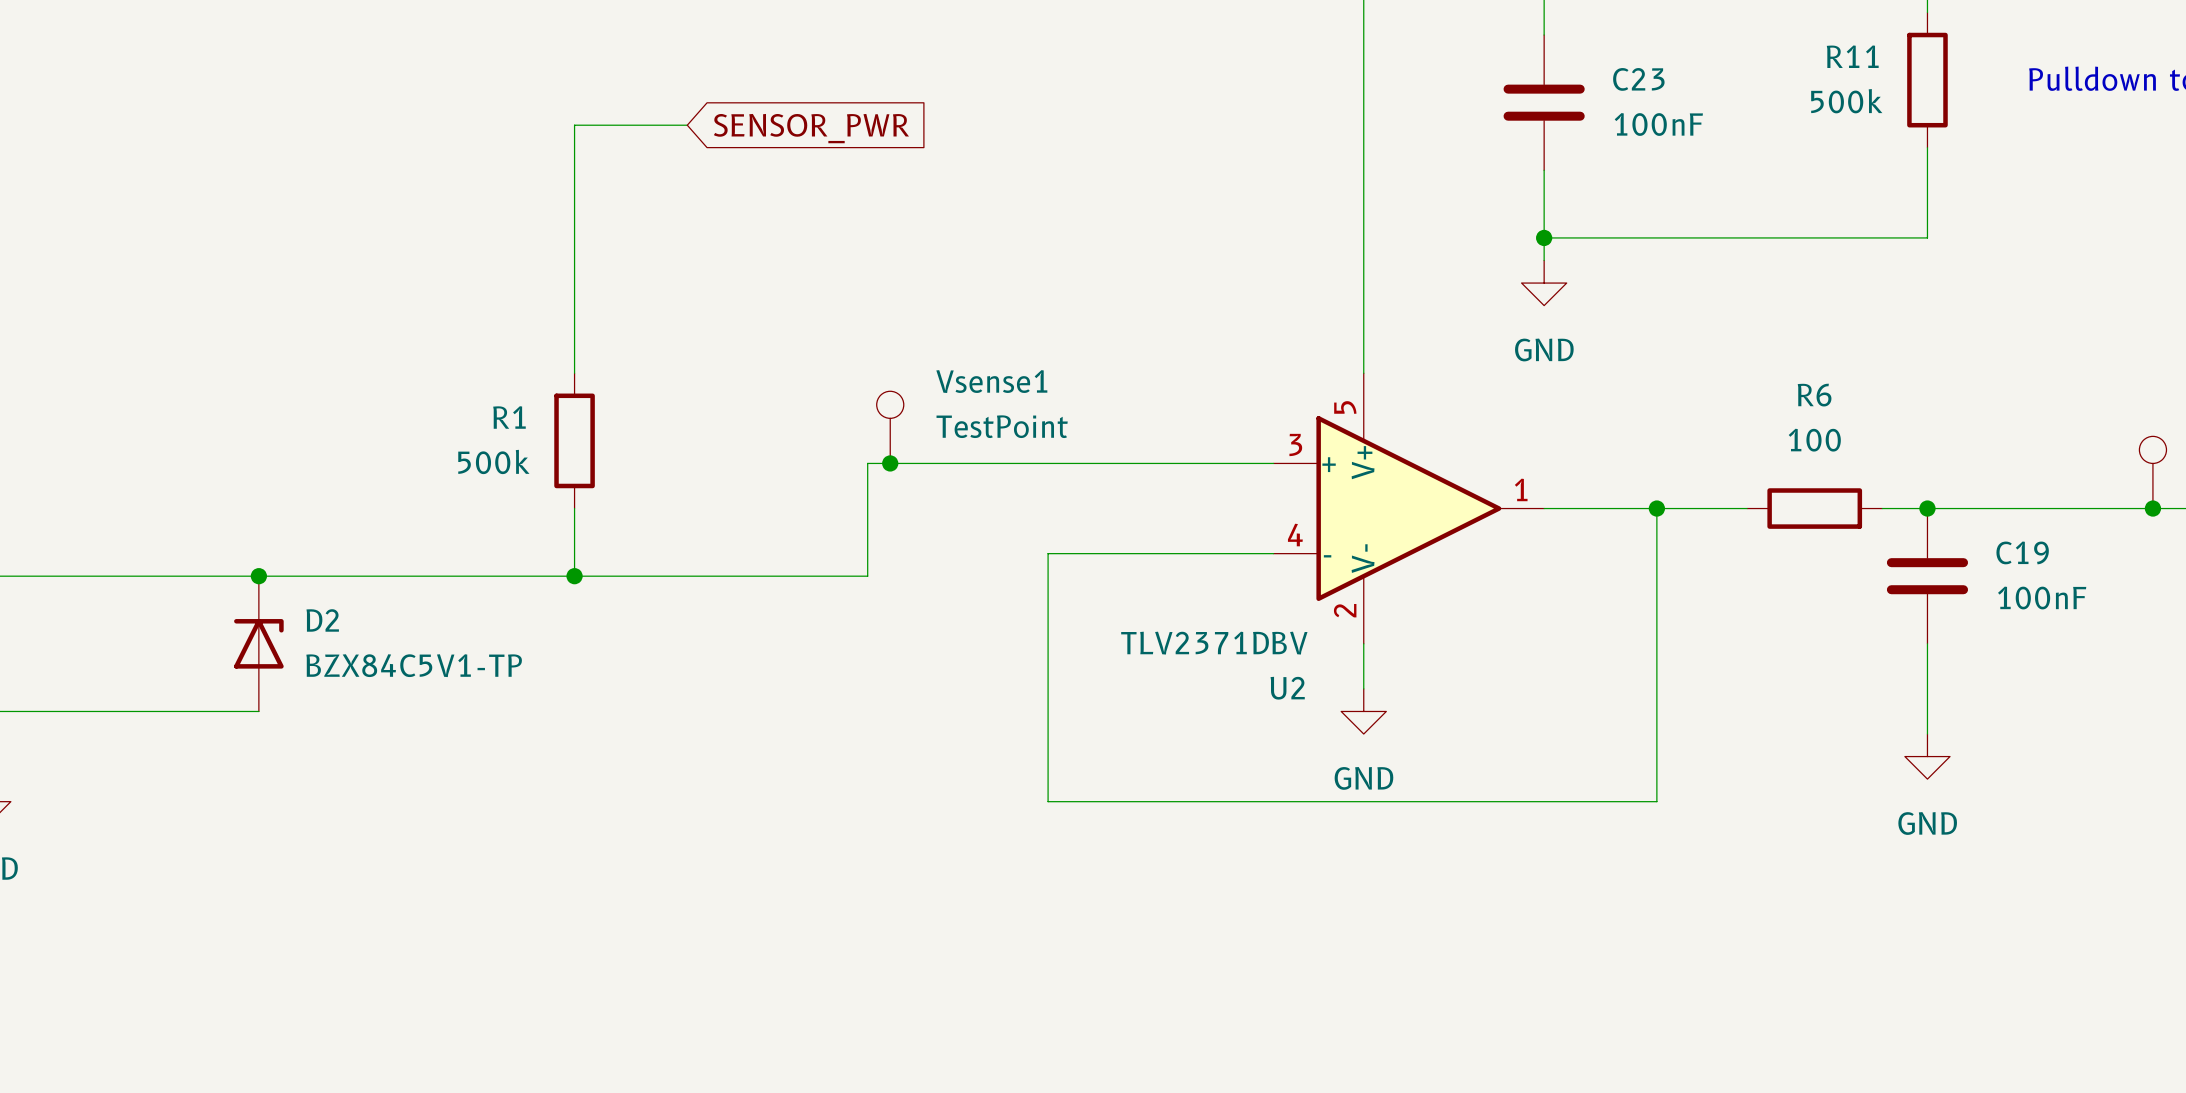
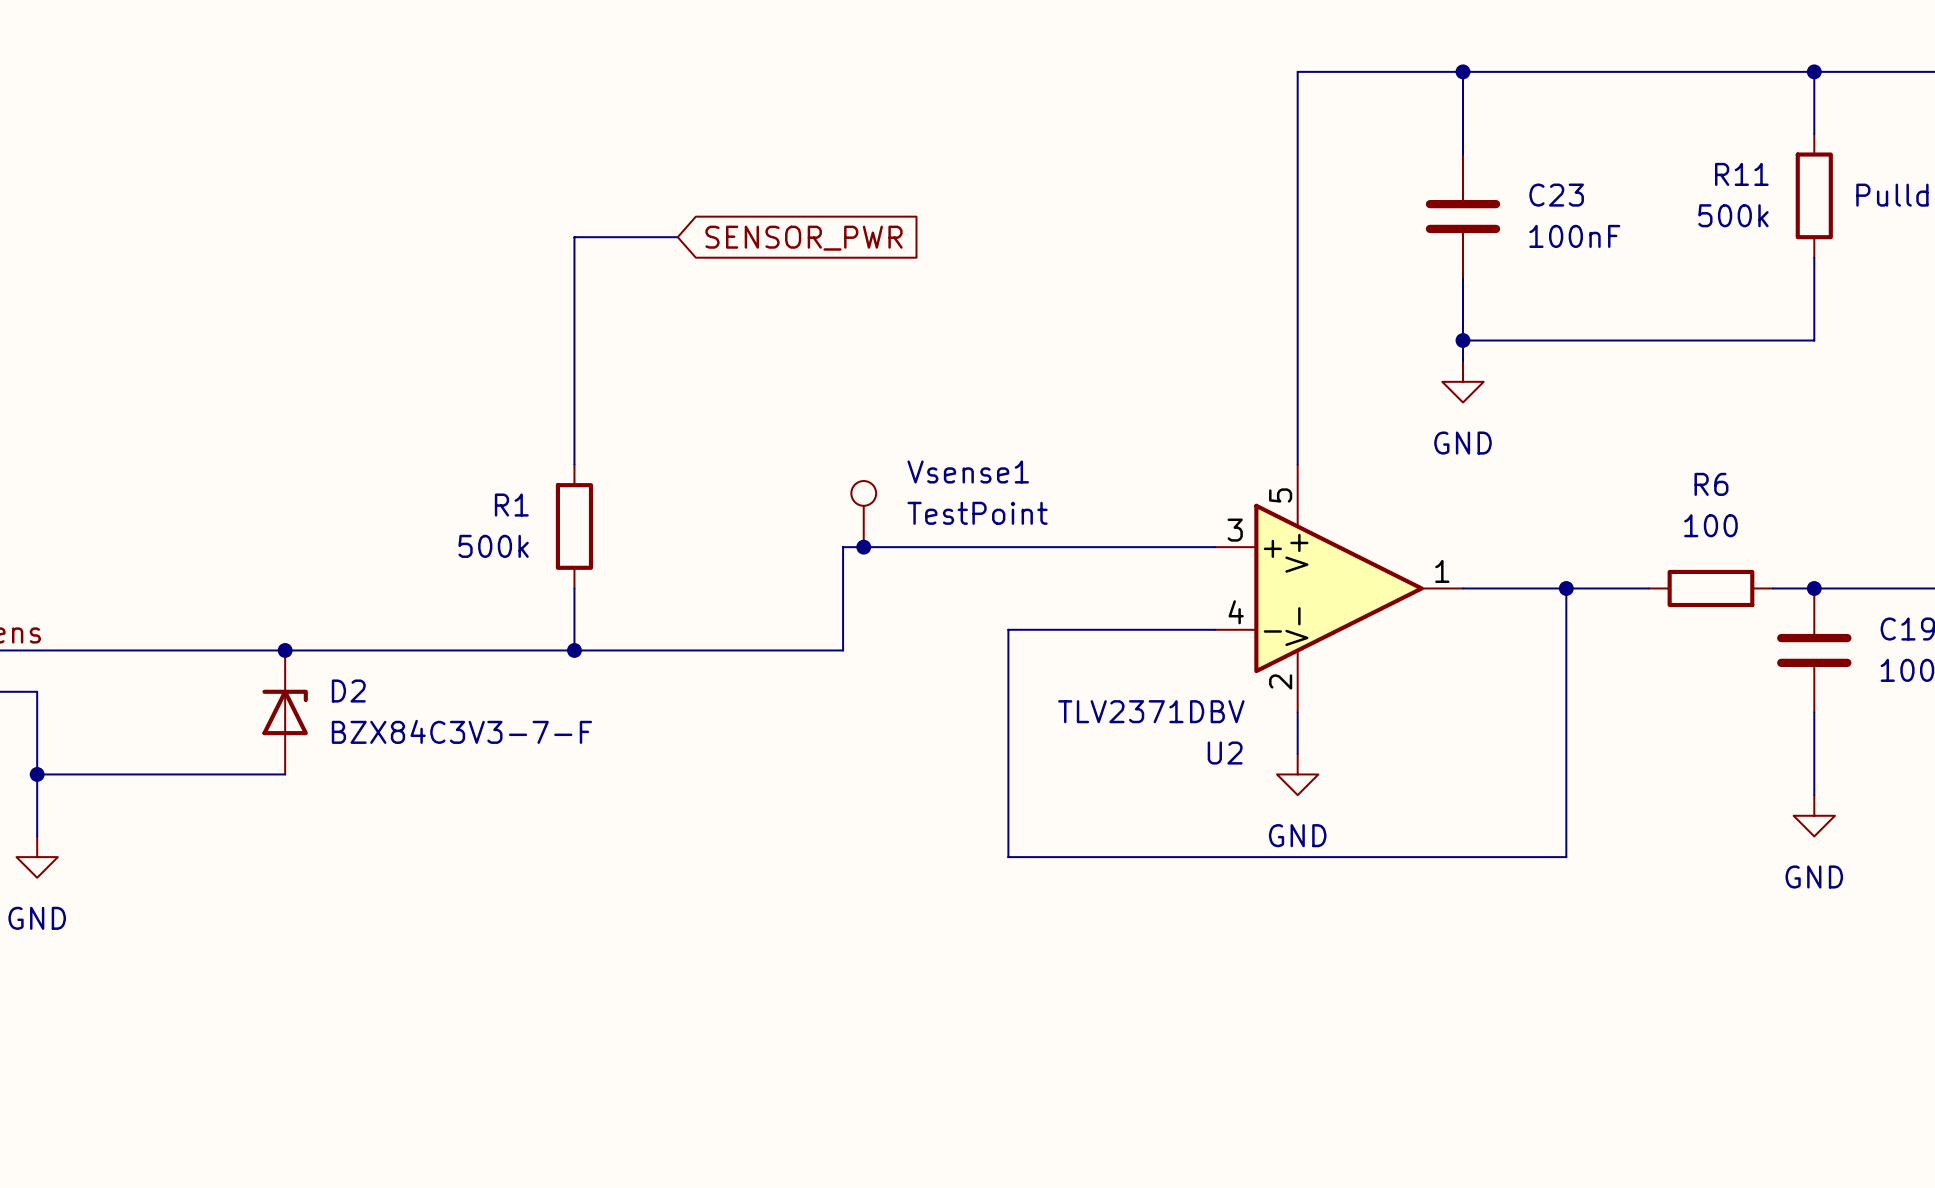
D2 value: BZX84C5V1-TP (414, 665) -> BZX84C3V3-7-F (461, 731)

